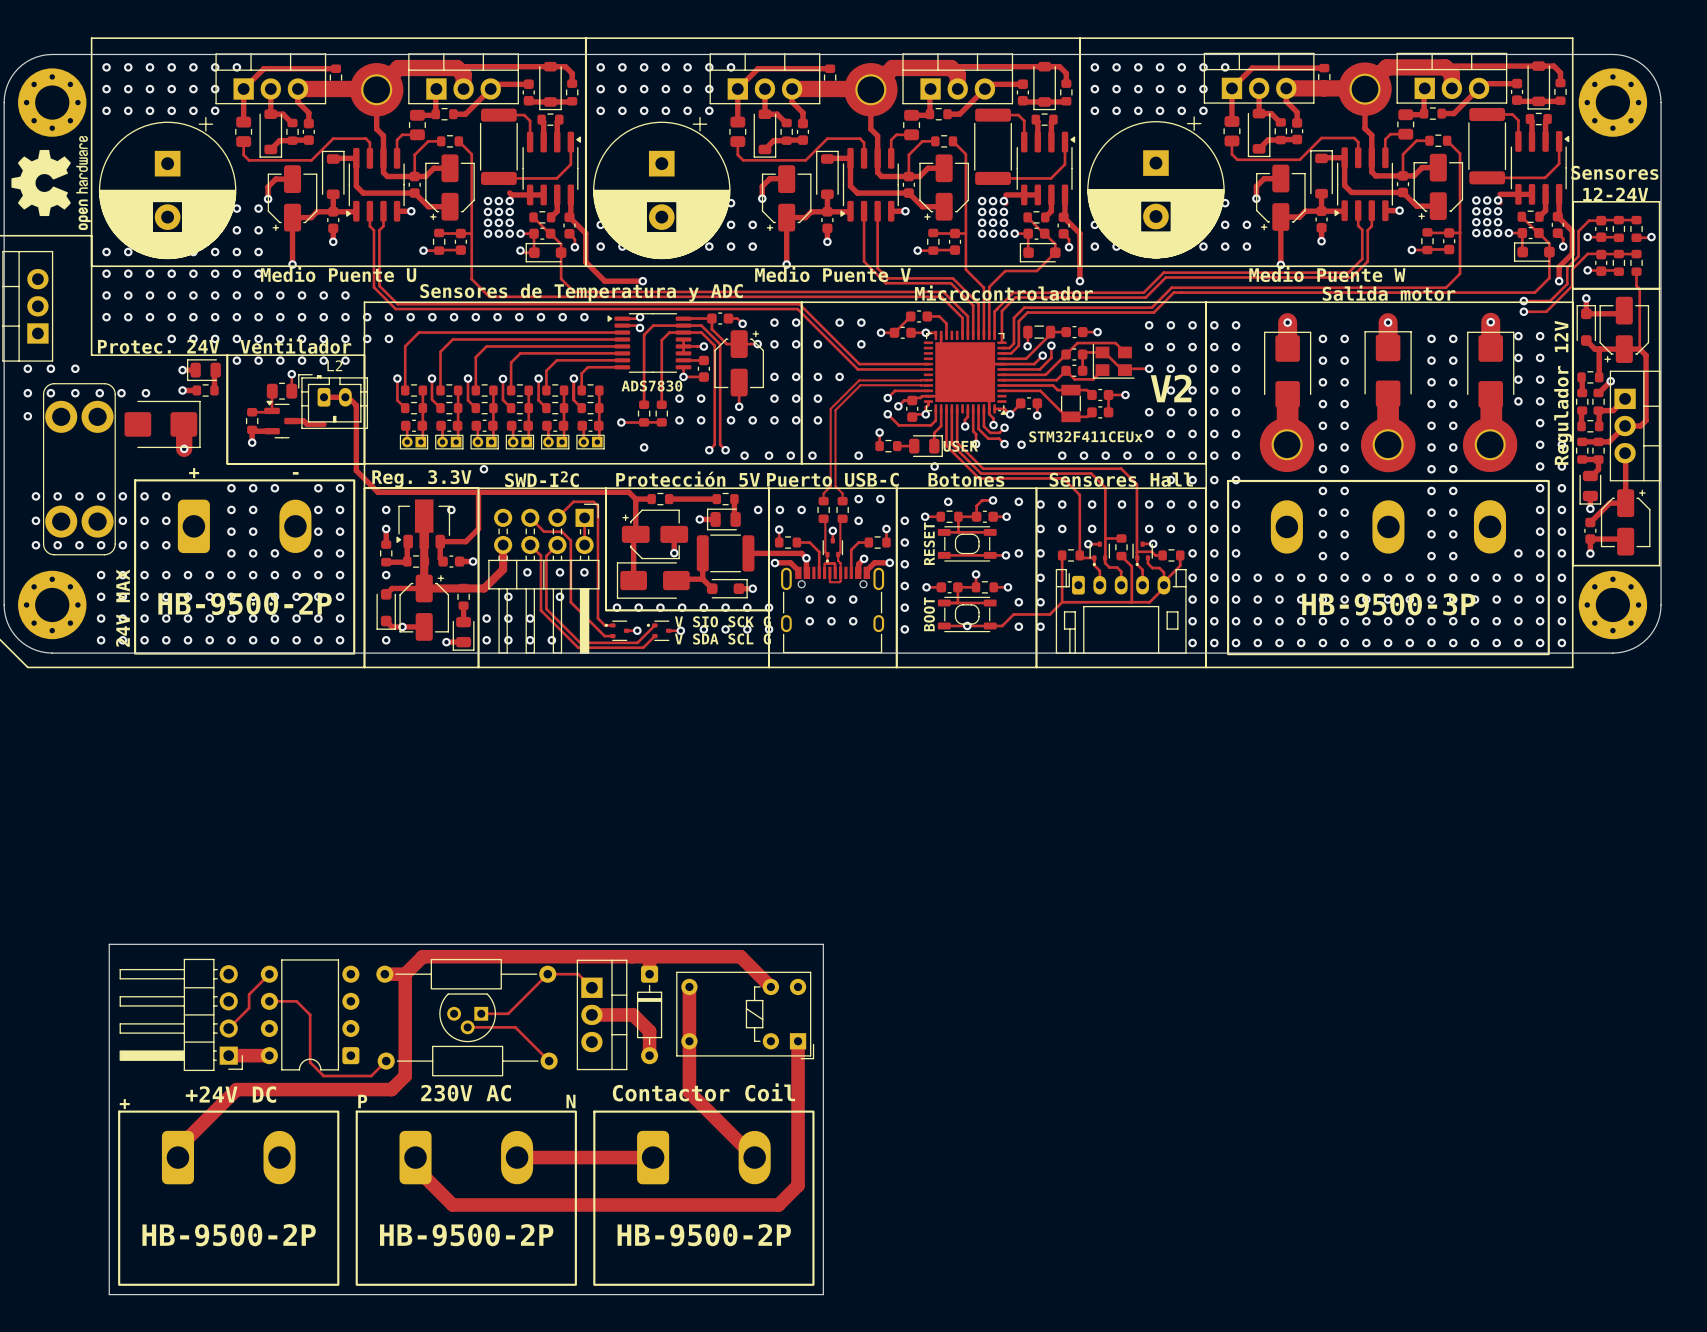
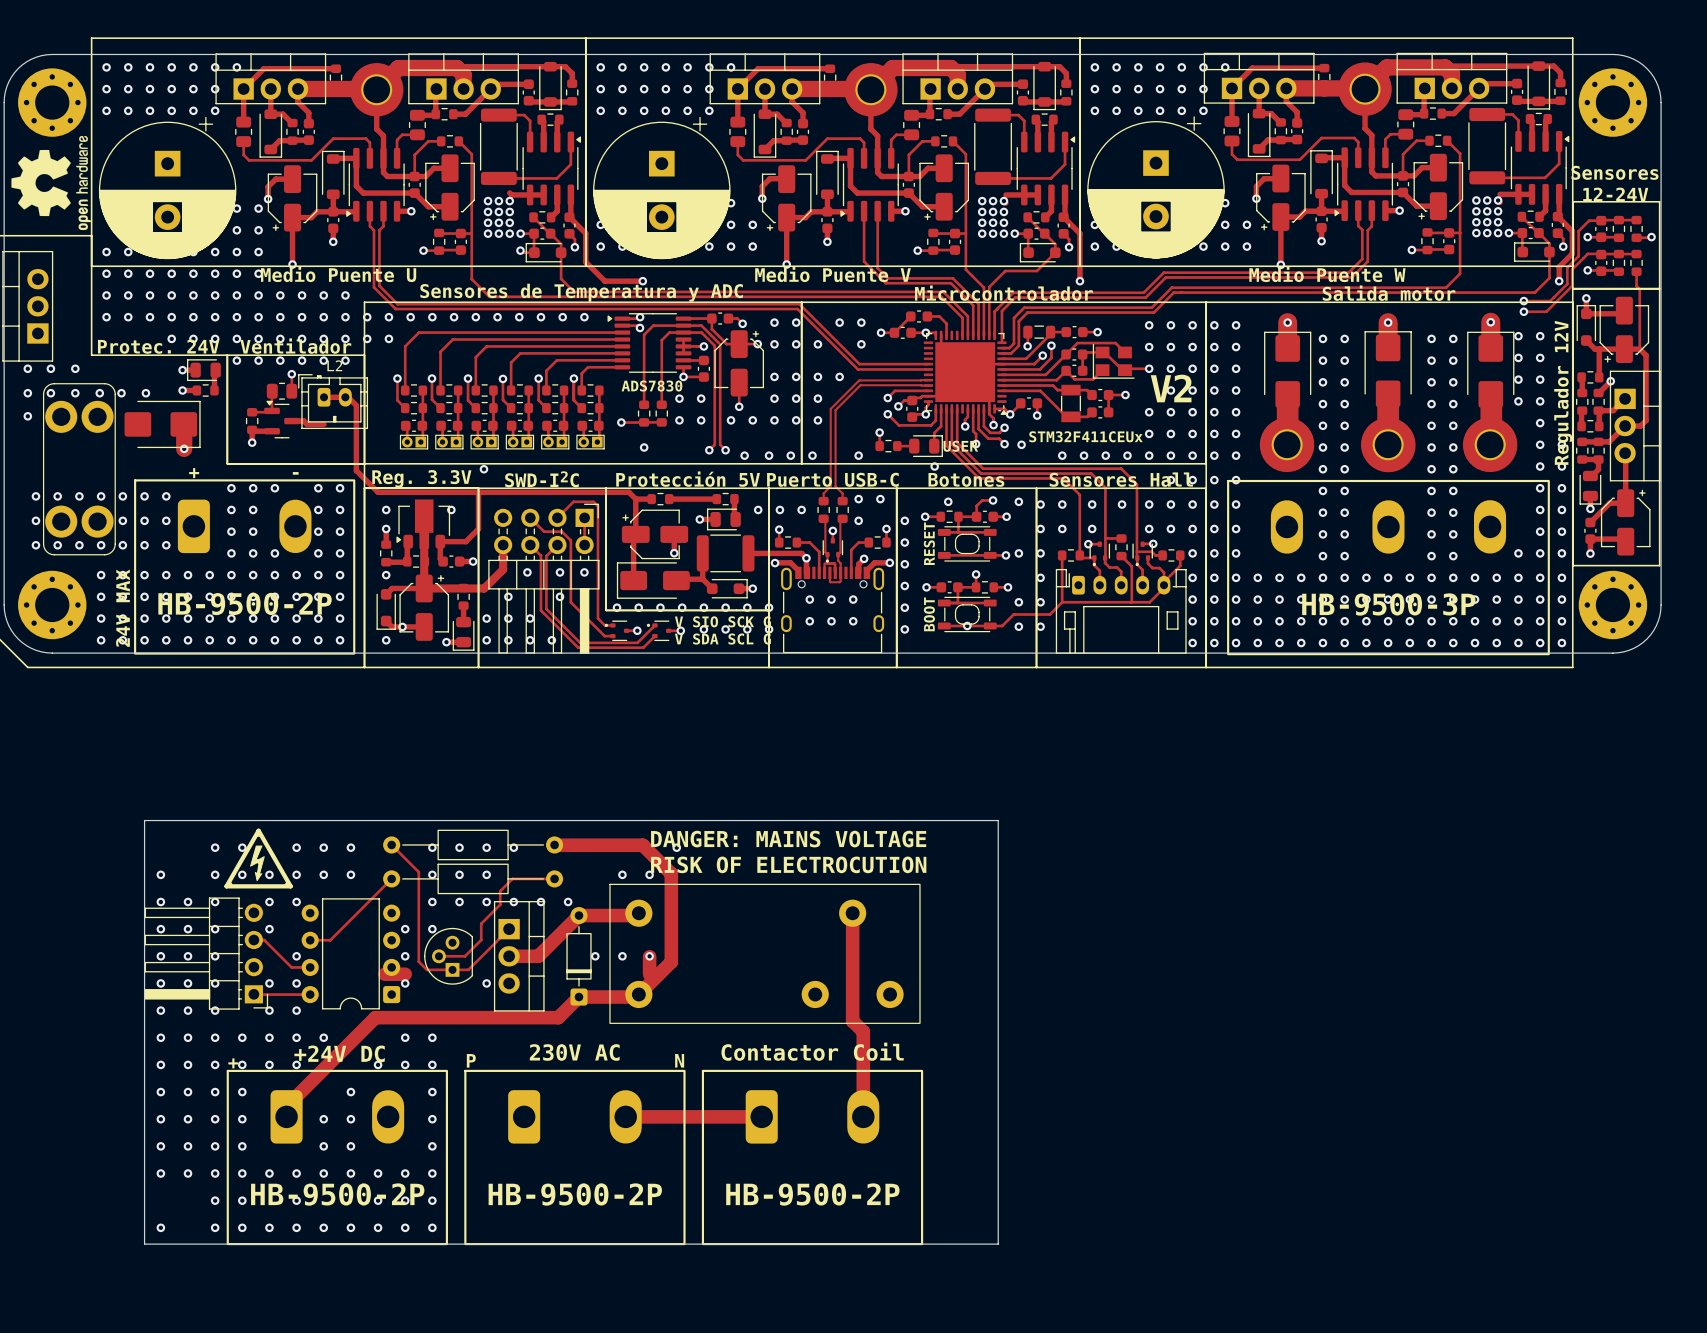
board edge: none -> (144, 820) (998, 820) (998, 1244) (144, 1244) (144, 820)
drawing: none -> [224, 828, 293, 889]
text: none -> DANGER: MAINS VOLTAGE (788, 839)
track: none -> (391, 844) (418, 872) (418, 961) (426, 969) (468, 969) (509, 929)
part: none -> (473, 844)
track: none -> (554, 844) (642, 845) (671, 873) (671, 962) (636, 997) (579, 997) (558, 1017) (375, 1017) (286, 1106) (286, 1116)
via: none -> (215, 847)
via: none -> (242, 847)
via: none -> (296, 847)
via: none -> (323, 847)
via: none -> (350, 847)
via: none -> (432, 847)
via: none -> (459, 847)
via: none -> (486, 847)
via: none -> (513, 847)
via: none -> (676, 847)
text: none -> RISK OF ELECTROCUTION (788, 864)
via: none -> (160, 874)
via: none -> (215, 874)
via: none -> (242, 874)
via: none -> (269, 874)
via: none -> (296, 874)
via: none -> (323, 874)
via: none -> (350, 874)
via: none -> (432, 874)
via: none -> (459, 874)
via: none -> (486, 874)
via: none -> (622, 874)
via: none -> (649, 874)
track: none -> (391, 878) (330, 940) (310, 940)
part: none -> (473, 878)
track: none -> (554, 878) (512, 878) (500, 891) (500, 904) (481, 923) (481, 940) (464, 956) (438, 956)
via: none -> (160, 901)
via: none -> (188, 901)
via: none -> (215, 901)
via: none -> (269, 901)
via: none -> (296, 901)
via: none -> (432, 901)
via: none -> (459, 901)
via: none -> (486, 901)
via: none -> (513, 901)
via: none -> (540, 901)
via: none -> (568, 901)
track: none -> (638, 913) (636, 915) (579, 915) (538, 956) (509, 956)
track: none -> (852, 913) (852, 1021) (863, 1031) (863, 1116)
via: none -> (160, 929)
via: none -> (188, 929)
via: none -> (215, 929)
via: none -> (269, 929)
via: none -> (405, 929)
via: none -> (432, 929)
track: none -> (253, 940) (264, 940) (291, 967) (310, 967)
board edge: (109, 944) (823, 944) (823, 1294) (109, 1294) (109, 944) -> none
part: none -> (764, 953)
via: none -> (160, 956)
via: none -> (188, 956)
via: none -> (215, 956)
via: none -> (296, 956)
via: none -> (405, 956)
via: none -> (595, 956)
via: none -> (622, 956)
via: none -> (649, 956)
track: (269, 974) (249, 994) (249, 1008) (228, 1028) -> none
part: (466, 974) -> none
via: none -> (160, 983)
via: none -> (188, 983)
via: none -> (215, 983)
via: none -> (269, 983)
via: none -> (296, 983)
via: none -> (405, 983)
via: none -> (486, 983)
track: (689, 986) (689, 1092) (754, 1157) -> none
track: (770, 986) (740, 956) (422, 956) (405, 974) (405, 1076) (391, 1089) (236, 1089) (177, 1148) (177, 1157) -> none
track: (591, 987) (578, 974) (547, 974) (508, 1013) (481, 1013) -> none
track: none -> (253, 994) (310, 994)
track: (269, 1001) (296, 1001) (310, 1014) (310, 1062) (323, 1076) (371, 1076) (384, 1062) -> none
via: none -> (160, 1010)
via: none -> (188, 1010)
via: none -> (215, 1010)
via: none -> (269, 1010)
via: none -> (296, 1010)
part position: (181, 1014) -> (206, 953)
part position: (310, 1014) -> (350, 953)
track: (591, 1014) (633, 1014) (649, 1031) (649, 1055) -> none
part position: (602, 1014) -> (519, 956)
part rotation: 0° (649, 1014) -> 180° (579, 956)
part position: (649, 1014) -> (579, 956)
part: (745, 1015) -> none
part rotation: 0° (467, 1017) -> 90° clockwise (448, 956)
part position: (467, 1017) -> (448, 956)
track: (467, 1027) (515, 1027) (549, 1061) -> none
via: none -> (160, 1037)
via: none -> (188, 1037)
via: none -> (215, 1037)
via: none -> (242, 1037)
via: none -> (269, 1037)
via: none -> (296, 1037)
via: none -> (323, 1037)
via: none -> (405, 1037)
via: none -> (432, 1037)
track: (798, 1041) (798, 1185) (778, 1204) (452, 1204) (415, 1167) (415, 1157) -> none
track: (228, 1055) (269, 1055) -> none
part: (467, 1061) -> none
via: none -> (160, 1064)
via: none -> (188, 1064)
via: none -> (215, 1064)
via: none -> (242, 1064)
via: none -> (269, 1064)
via: none -> (296, 1064)
via: none -> (378, 1064)
via: none -> (405, 1064)
via: none -> (432, 1064)
via: none -> (160, 1092)
via: none -> (188, 1092)
via: none -> (215, 1092)
via: none -> (242, 1092)
via: none -> (350, 1092)
via: none -> (432, 1092)
text position: Contactor Coil (703, 1092) -> Contactor Coil (812, 1051)
text position: 230V AC (466, 1093) -> 230V AC (574, 1052)
text position: +24V DC (230, 1094) -> +24V DC (339, 1053)
text position: P (362, 1101) -> P (471, 1060)
text position: N (571, 1101) -> N (679, 1060)
text position: + (124, 1104) -> + (233, 1063)
via: none -> (160, 1119)
via: none -> (188, 1119)
via: none -> (215, 1119)
via: none -> (242, 1119)
via: none -> (323, 1119)
via: none -> (350, 1119)
via: none -> (432, 1119)
via: none -> (160, 1146)
via: none -> (188, 1146)
via: none -> (215, 1146)
via: none -> (242, 1146)
via: none -> (323, 1146)
via: none -> (350, 1146)
via: none -> (432, 1146)
part: none -> (337, 1157)
track: (517, 1157) (653, 1157) -> (625, 1116) (761, 1116)
part: none -> (574, 1157)
part: none -> (812, 1157)
via: none -> (160, 1173)
via: none -> (188, 1173)
via: none -> (215, 1173)
via: none -> (242, 1173)
via: none -> (269, 1173)
via: none -> (296, 1173)
via: none -> (323, 1173)
via: none -> (350, 1173)
via: none -> (378, 1173)
via: none -> (405, 1173)
via: none -> (432, 1173)
text: none -> HB-9500-2P (337, 1194)
text: none -> HB-9500-2P (575, 1194)
text: none -> HB-9500-2P (812, 1194)
part: (228, 1198) -> none
part: (466, 1198) -> none
part: (703, 1198) -> none
via: none -> (215, 1200)
via: none -> (242, 1200)
via: none -> (296, 1200)
via: none -> (378, 1200)
via: none -> (405, 1200)
via: none -> (432, 1200)
via: none -> (160, 1227)
via: none -> (215, 1227)
via: none -> (242, 1227)
via: none -> (269, 1227)
via: none -> (296, 1227)
via: none -> (323, 1227)
via: none -> (350, 1227)
via: none -> (378, 1227)
via: none -> (405, 1227)
via: none -> (432, 1227)
text: HB-9500-2P (229, 1235) -> none
text: HB-9500-2P (466, 1235) -> none
text: HB-9500-2P (704, 1235) -> none

